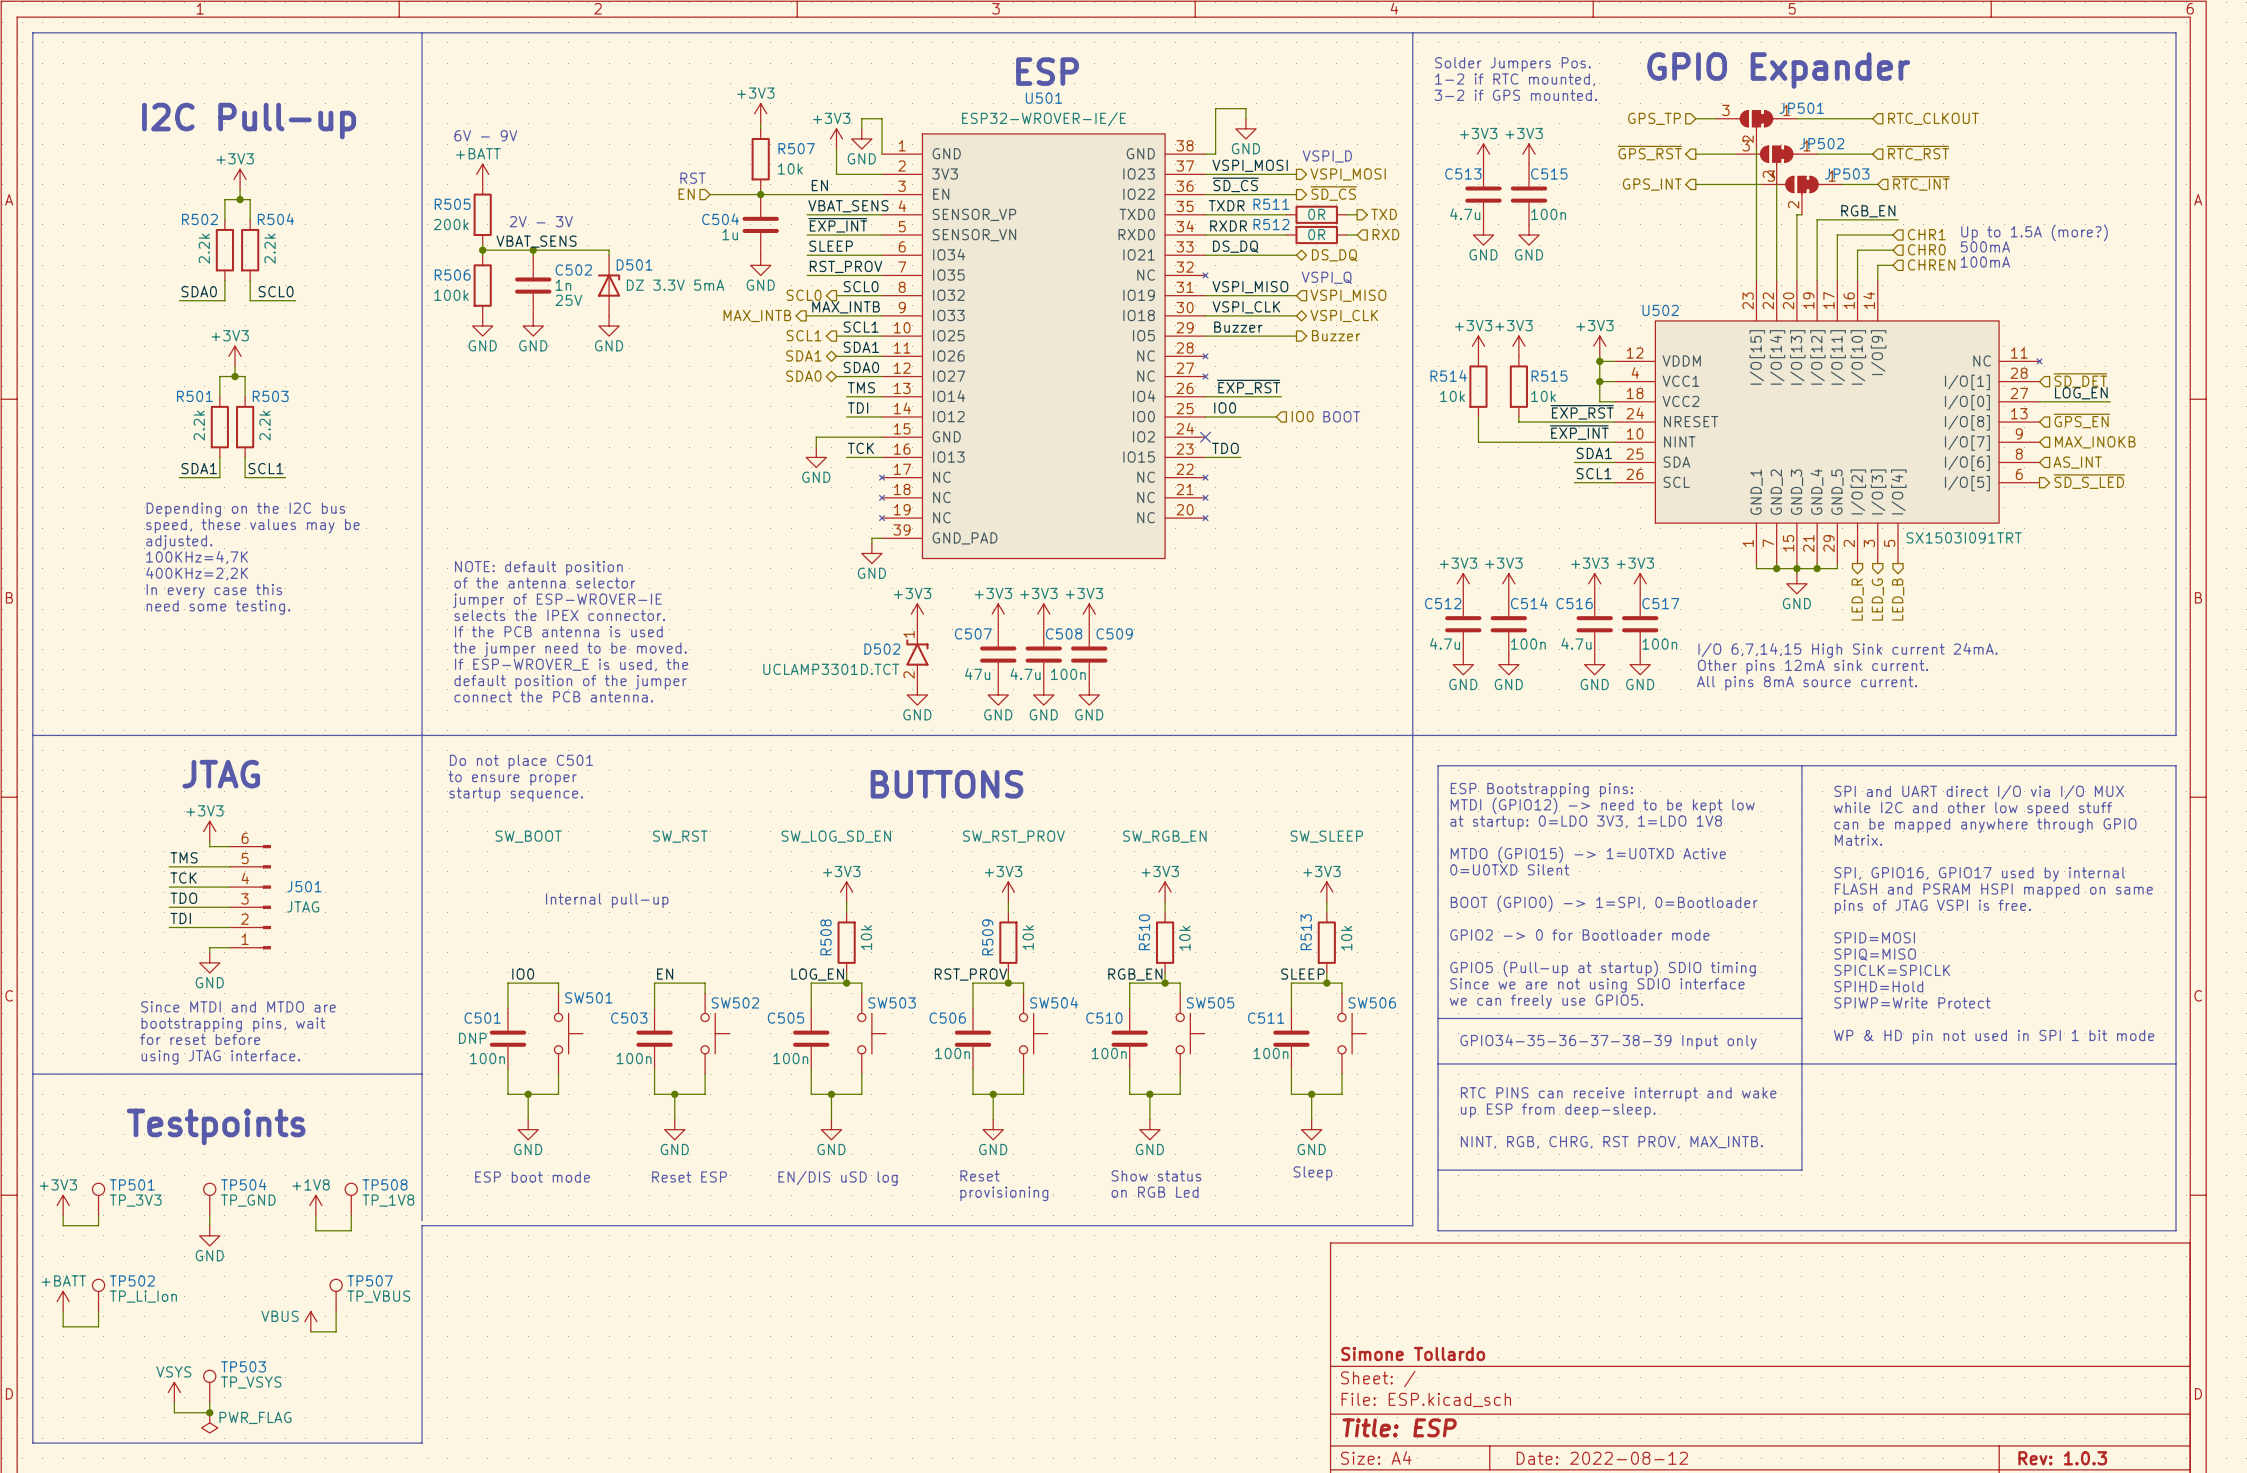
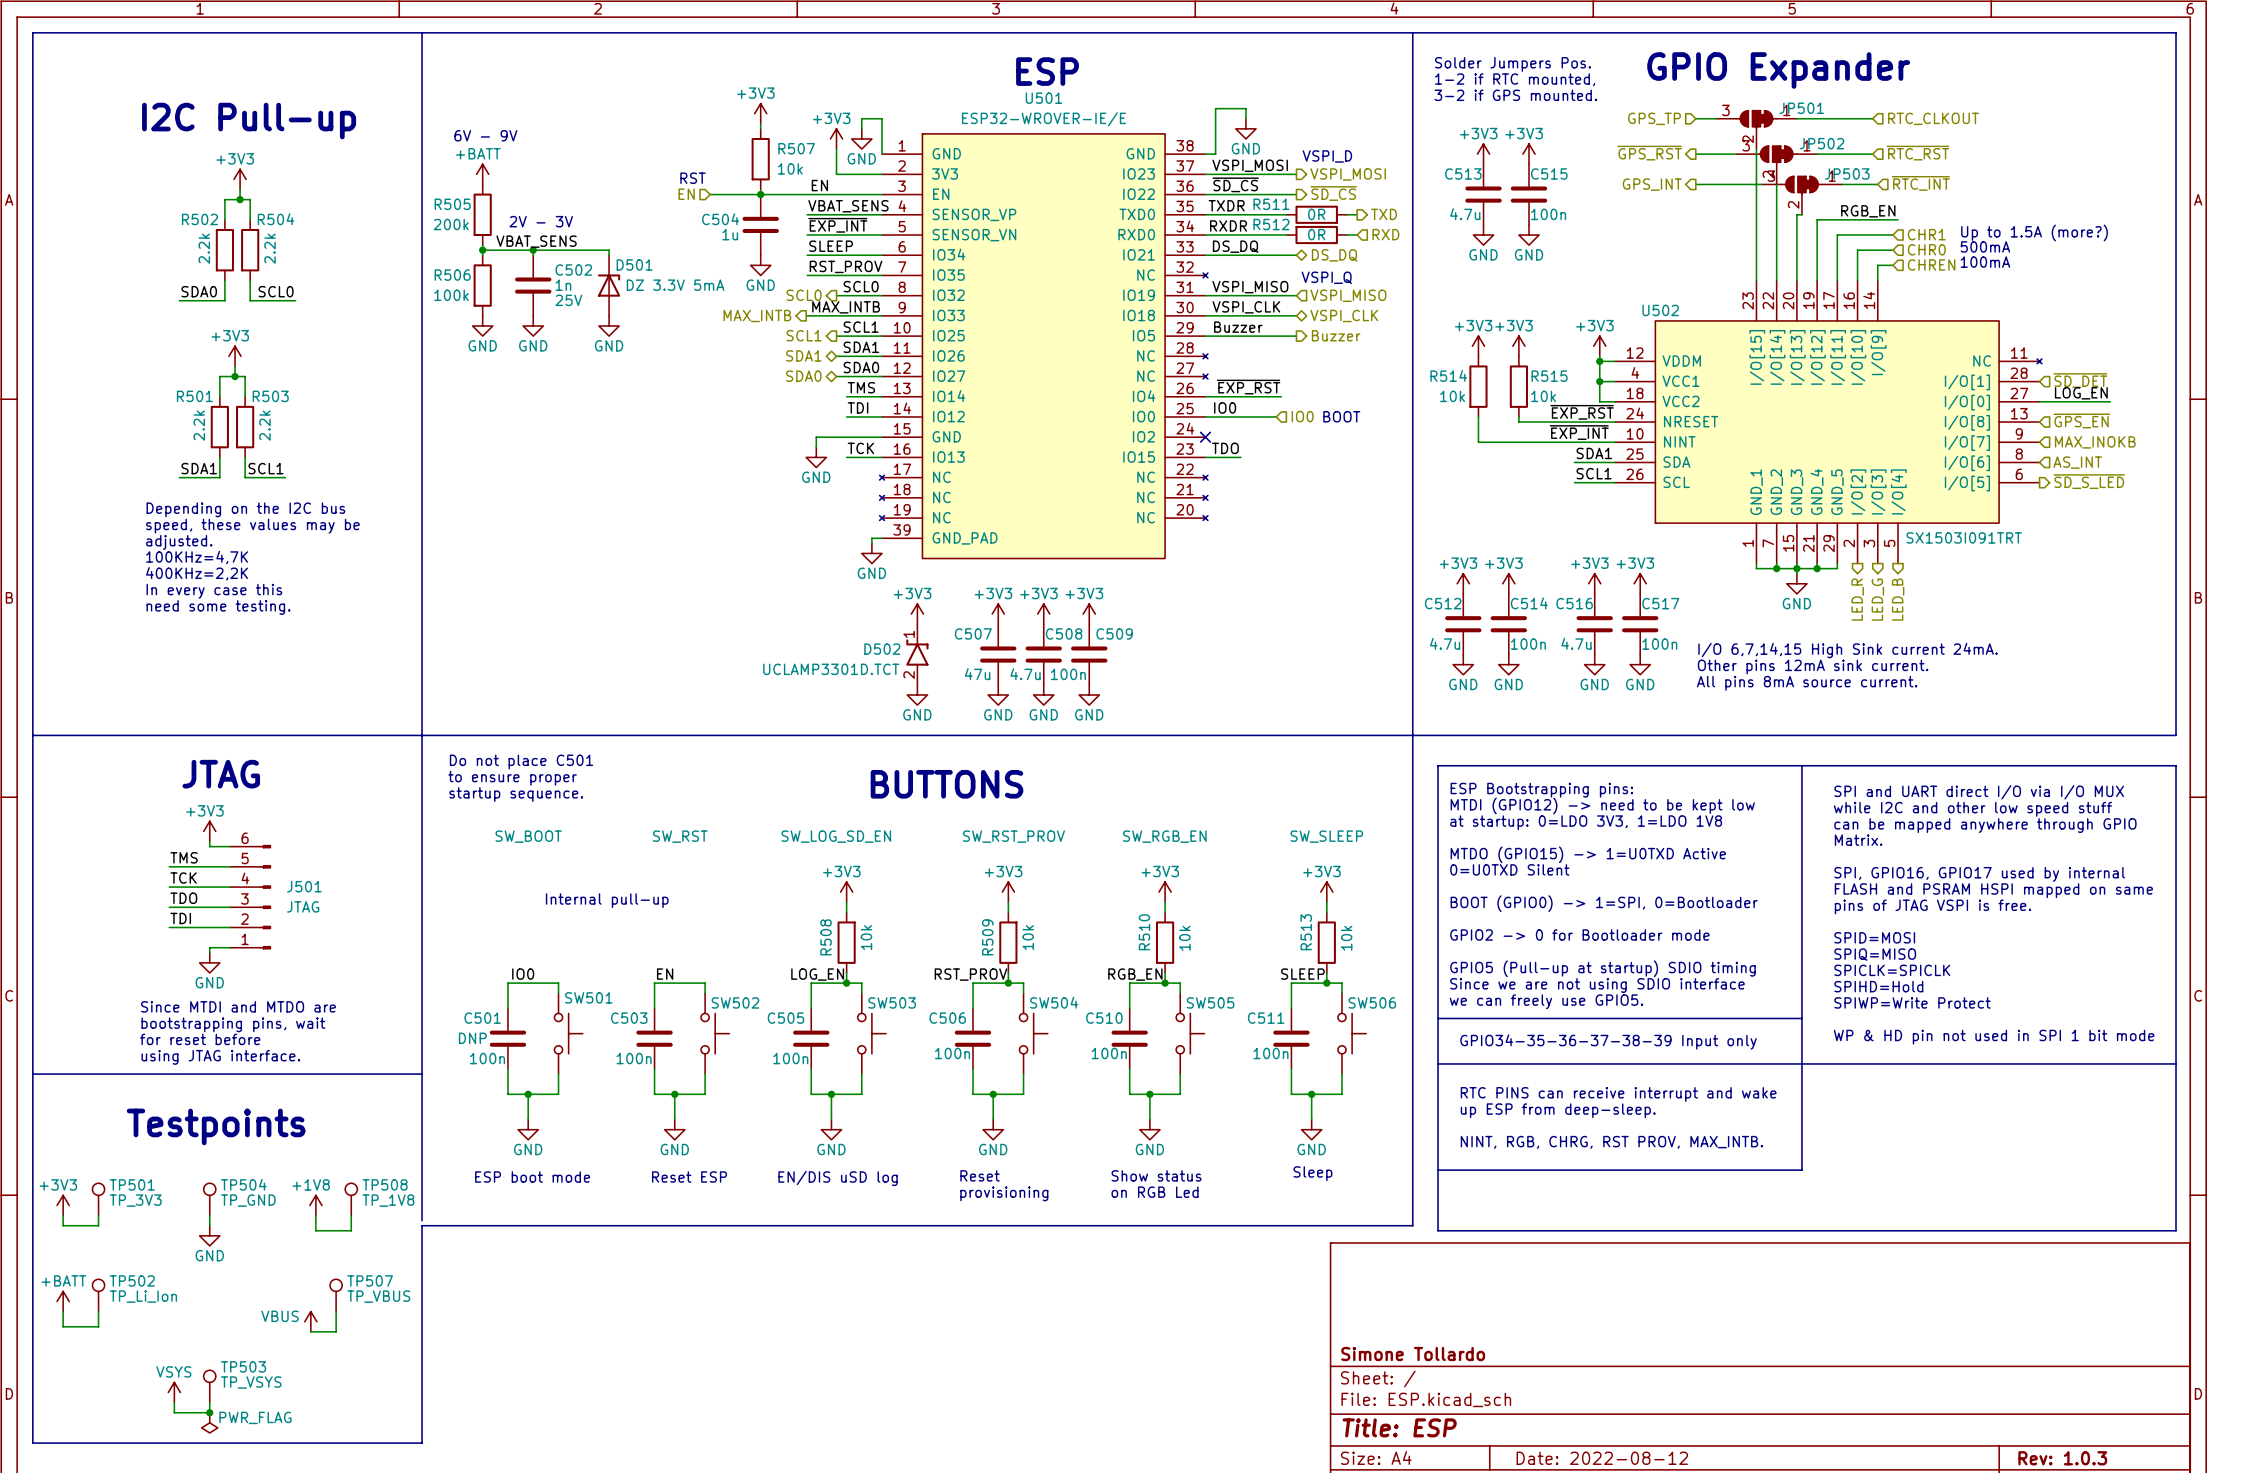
text: NOTE: default position (538, 568) -> none
text: of the antenna selector (544, 582) -> none
text: jumper of ESP-WROVER-IE (557, 600) -> none
text: selects the IPEX connector. (559, 615) -> none
text: If the PCB antenna is used (558, 631) -> none
text: the jumper need to be moved. (570, 649) -> none
text: If ESP-WROVER_E is used, the (571, 664) -> none
text: default position of the jumper (570, 682) -> none
text: connect the PCB antenna. (553, 696) -> none

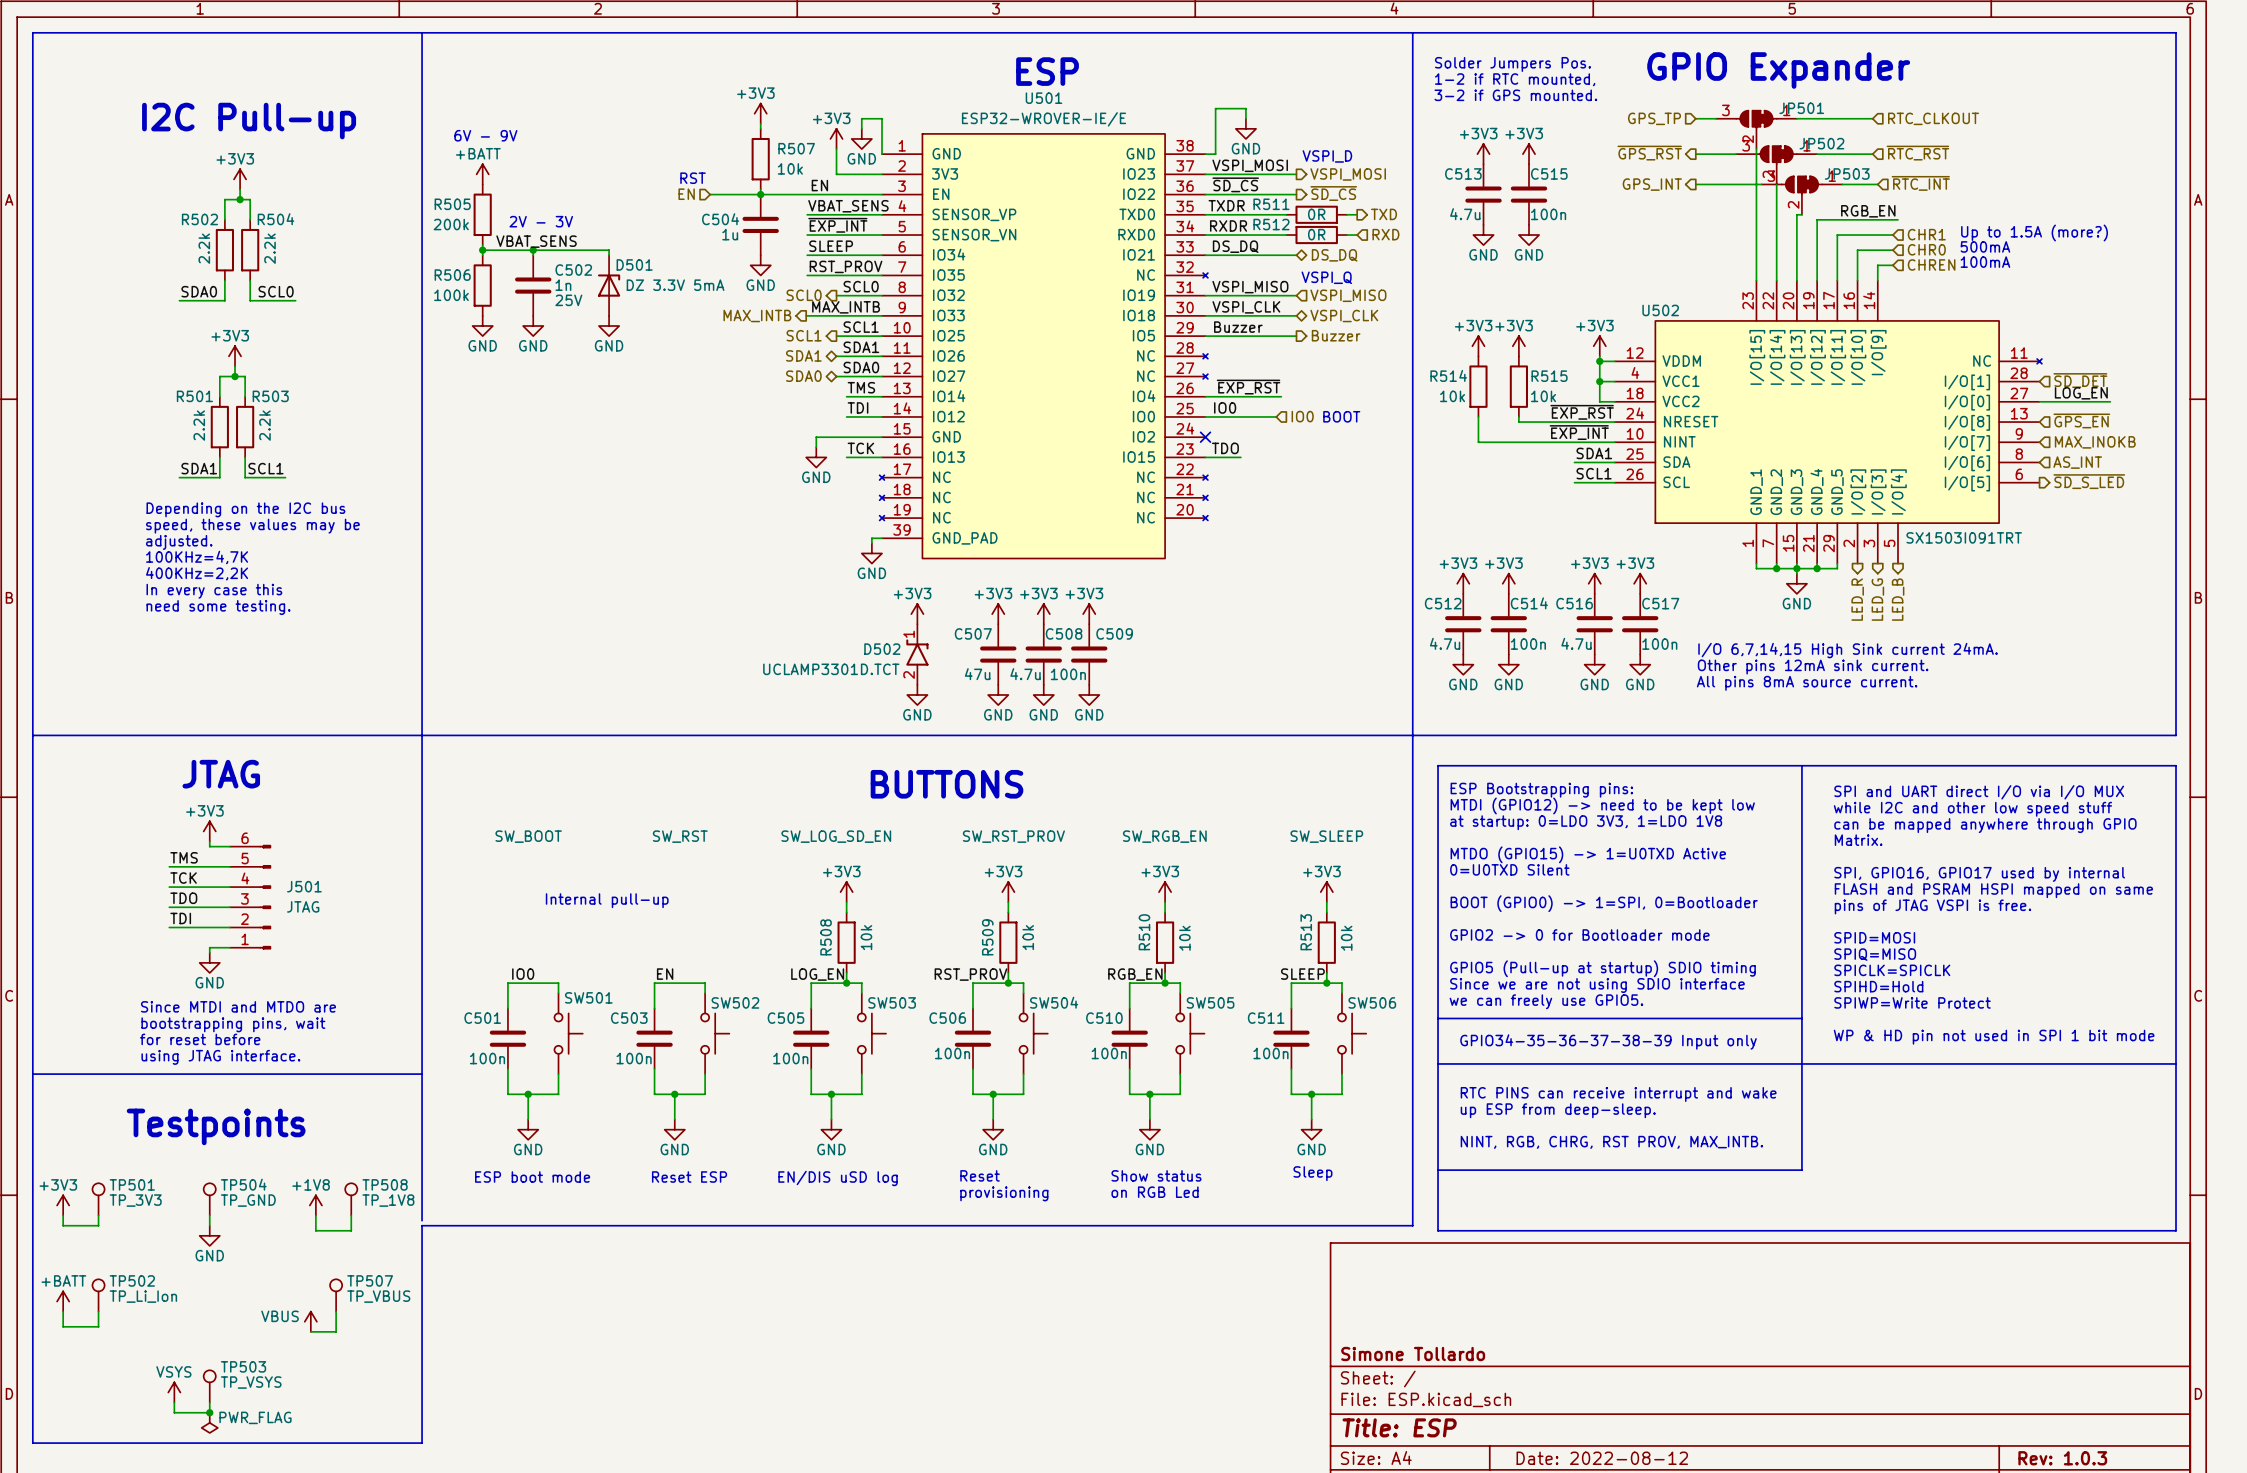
text: Do not place C501 (521, 761) -> none
text: to ensure proper (512, 778) -> none
text: startup sequence. (516, 794) -> none
C501 text: DNP (472, 1038) -> none

